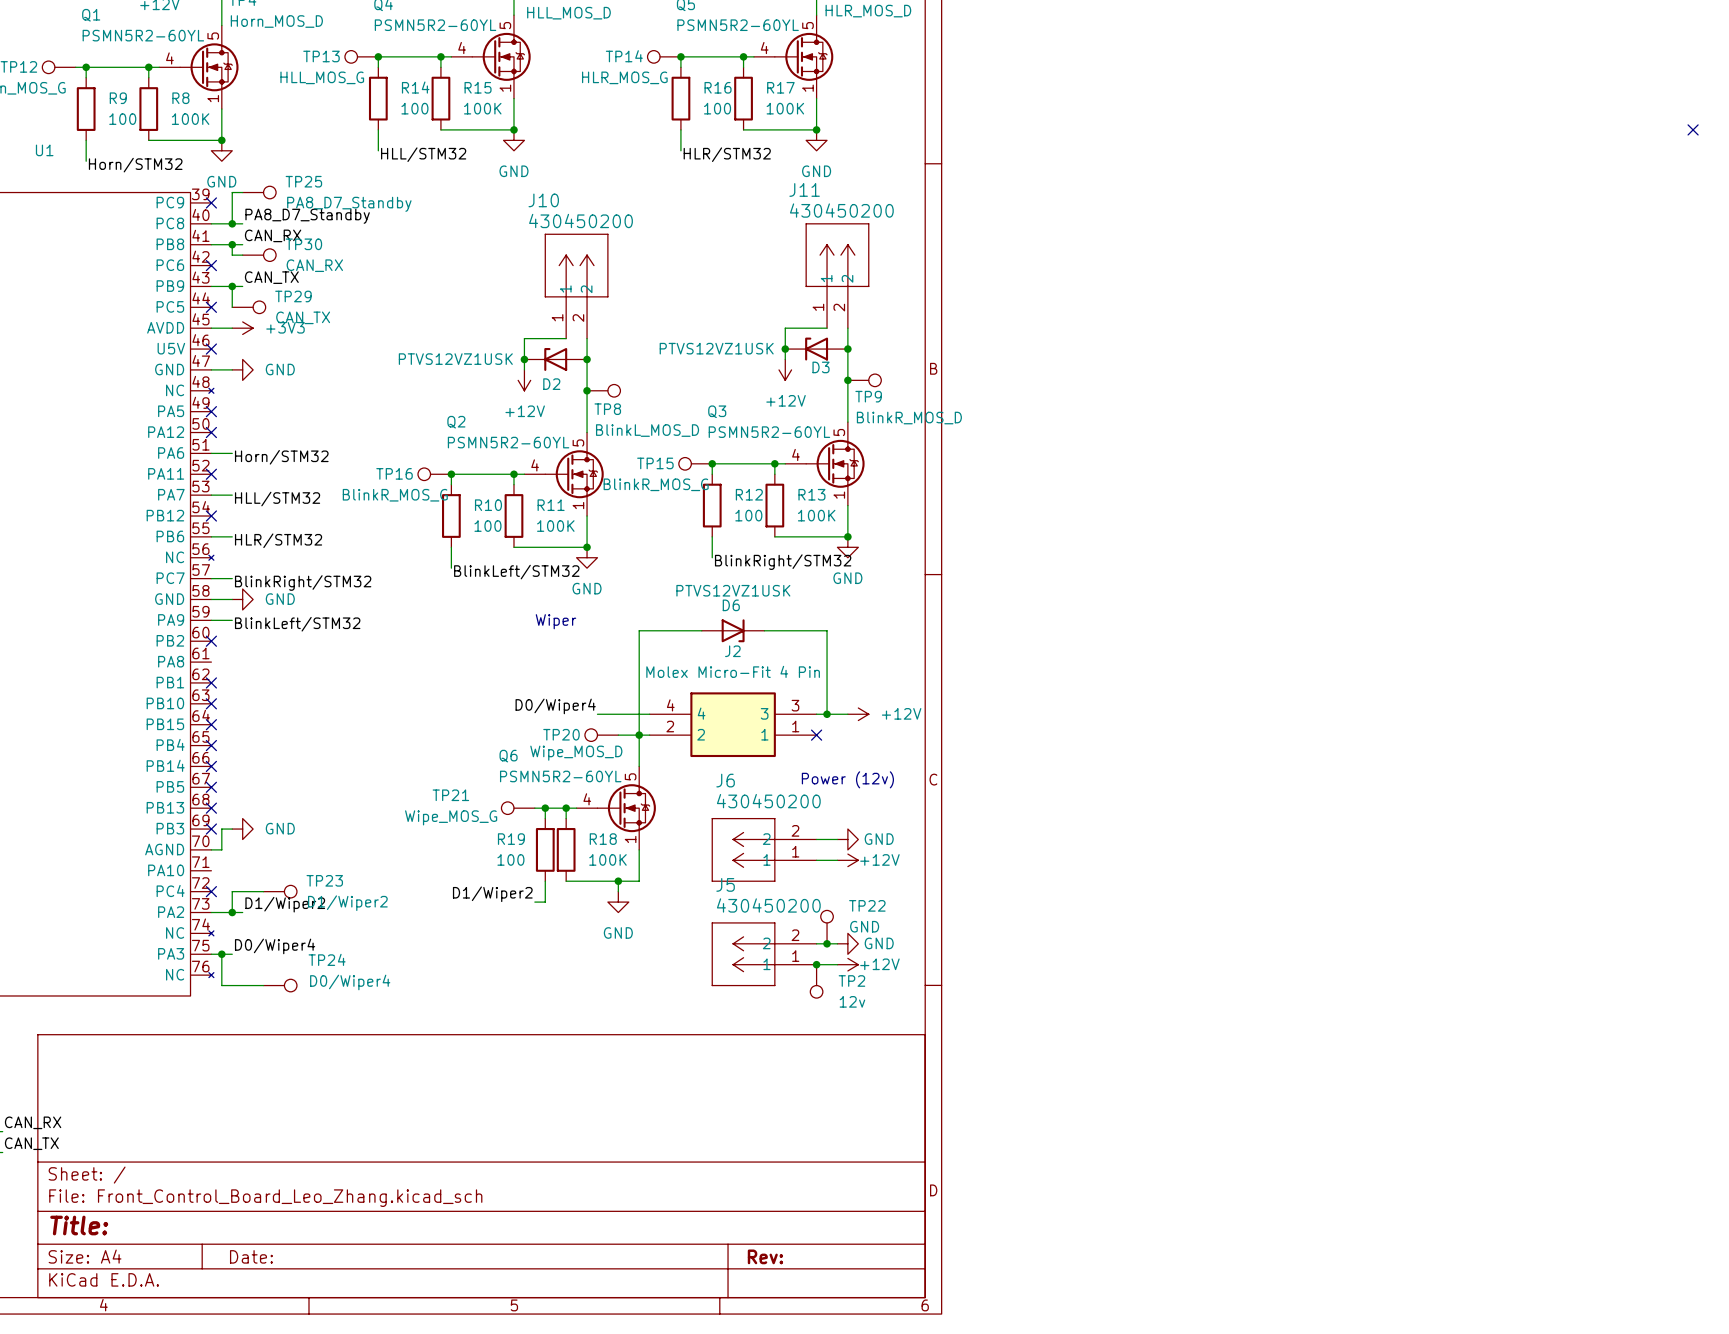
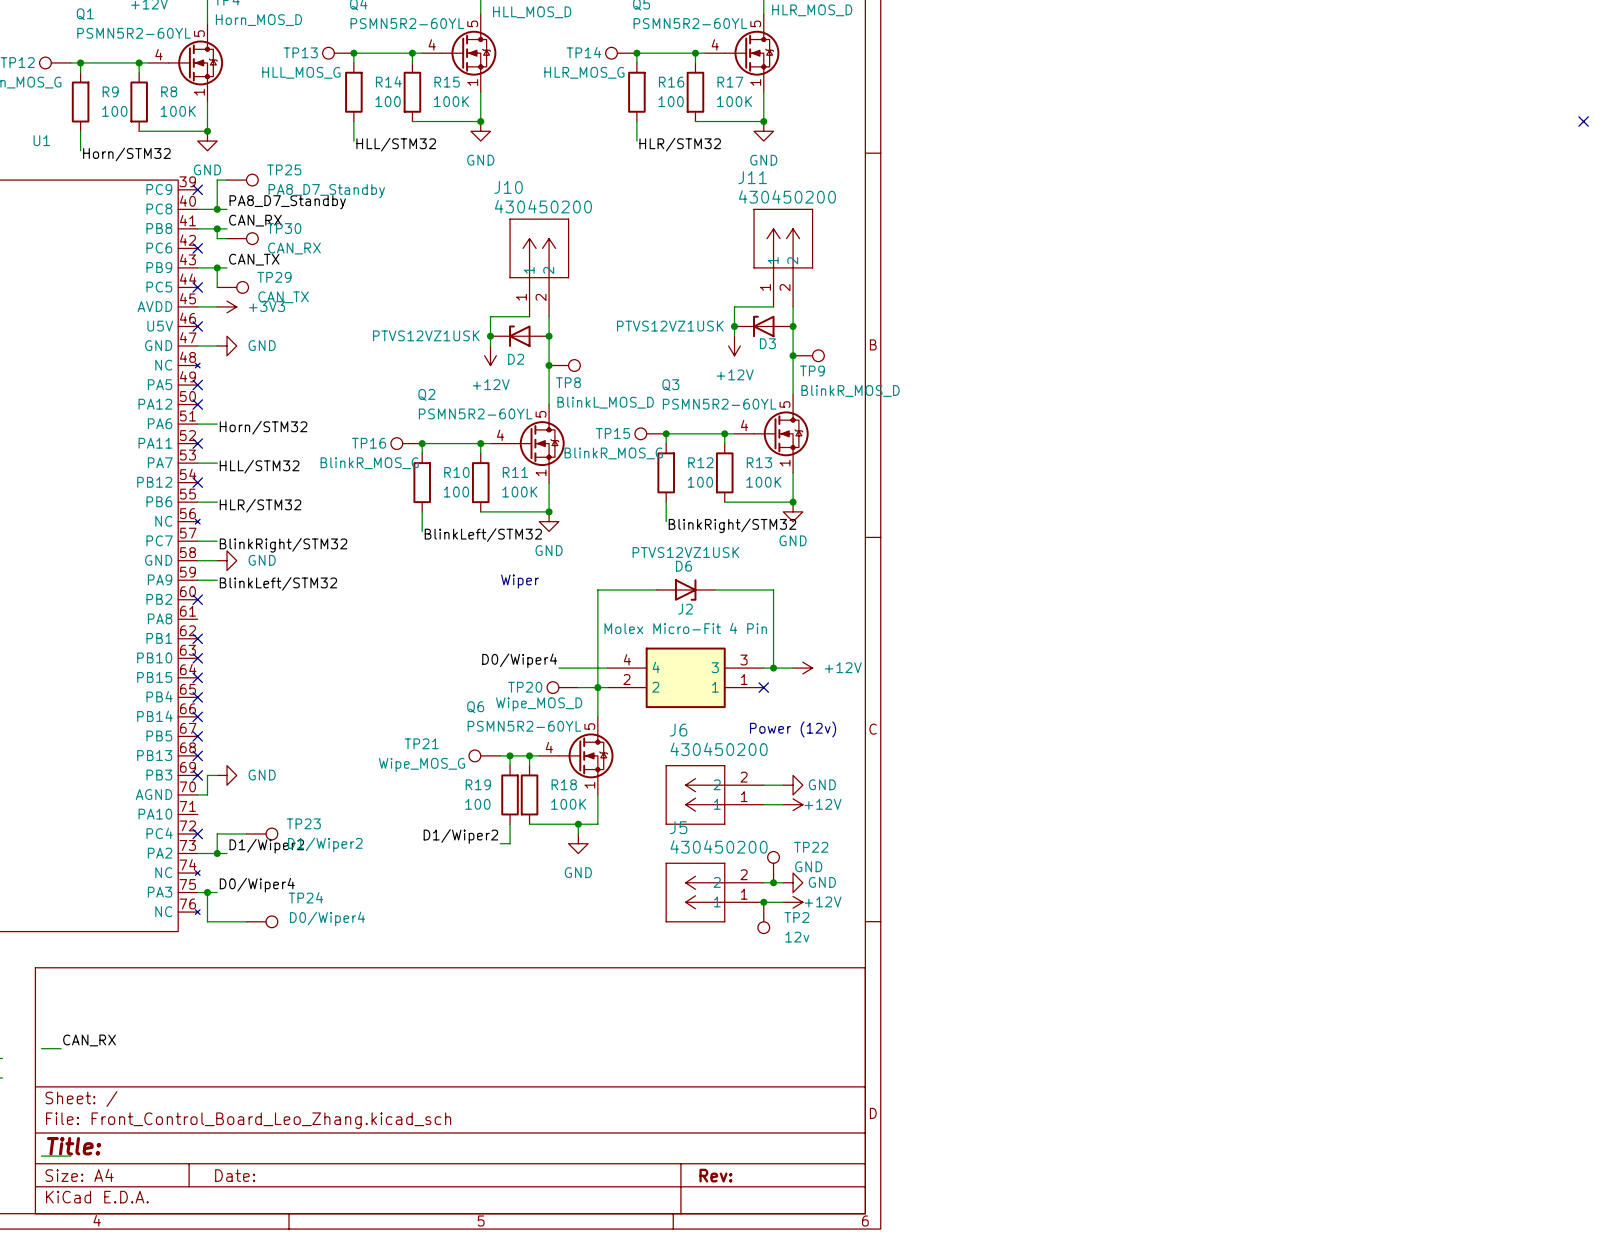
wire: none -> (41, 1048) (61, 1048)
label position: CAN_RX (33, 1122) -> CAN_RX (89, 1040)
label: CAN_TX (31, 1143) -> none
wire: none -> (41, 1156) (70, 1156)

